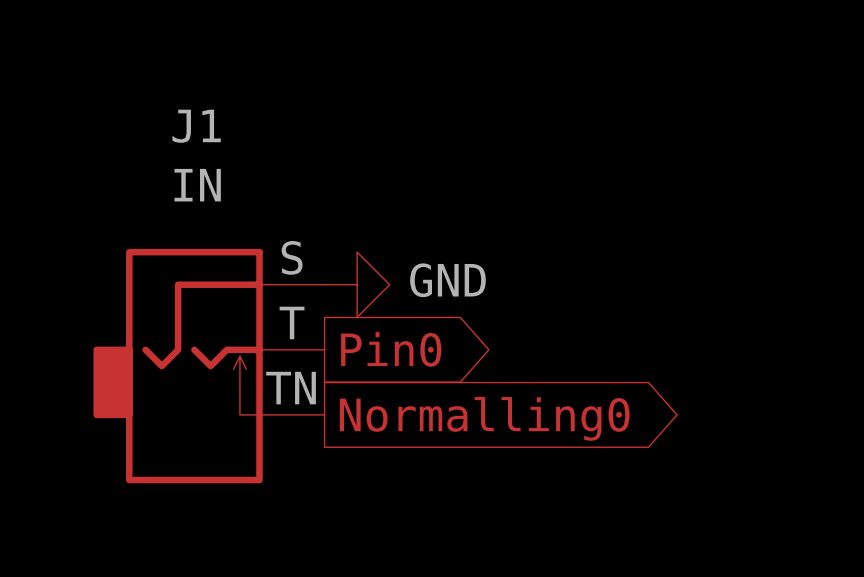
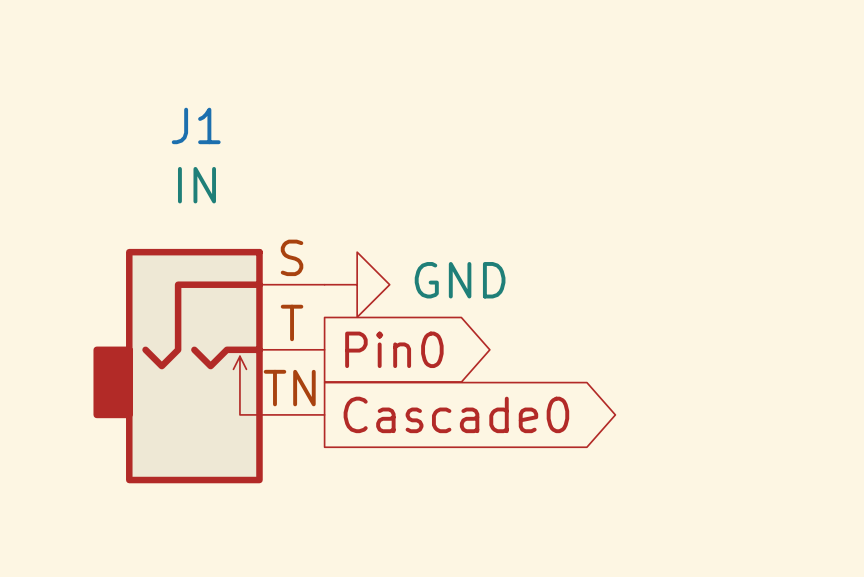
global label: Normalling0 (484, 418) -> Cascade0 (456, 414)

